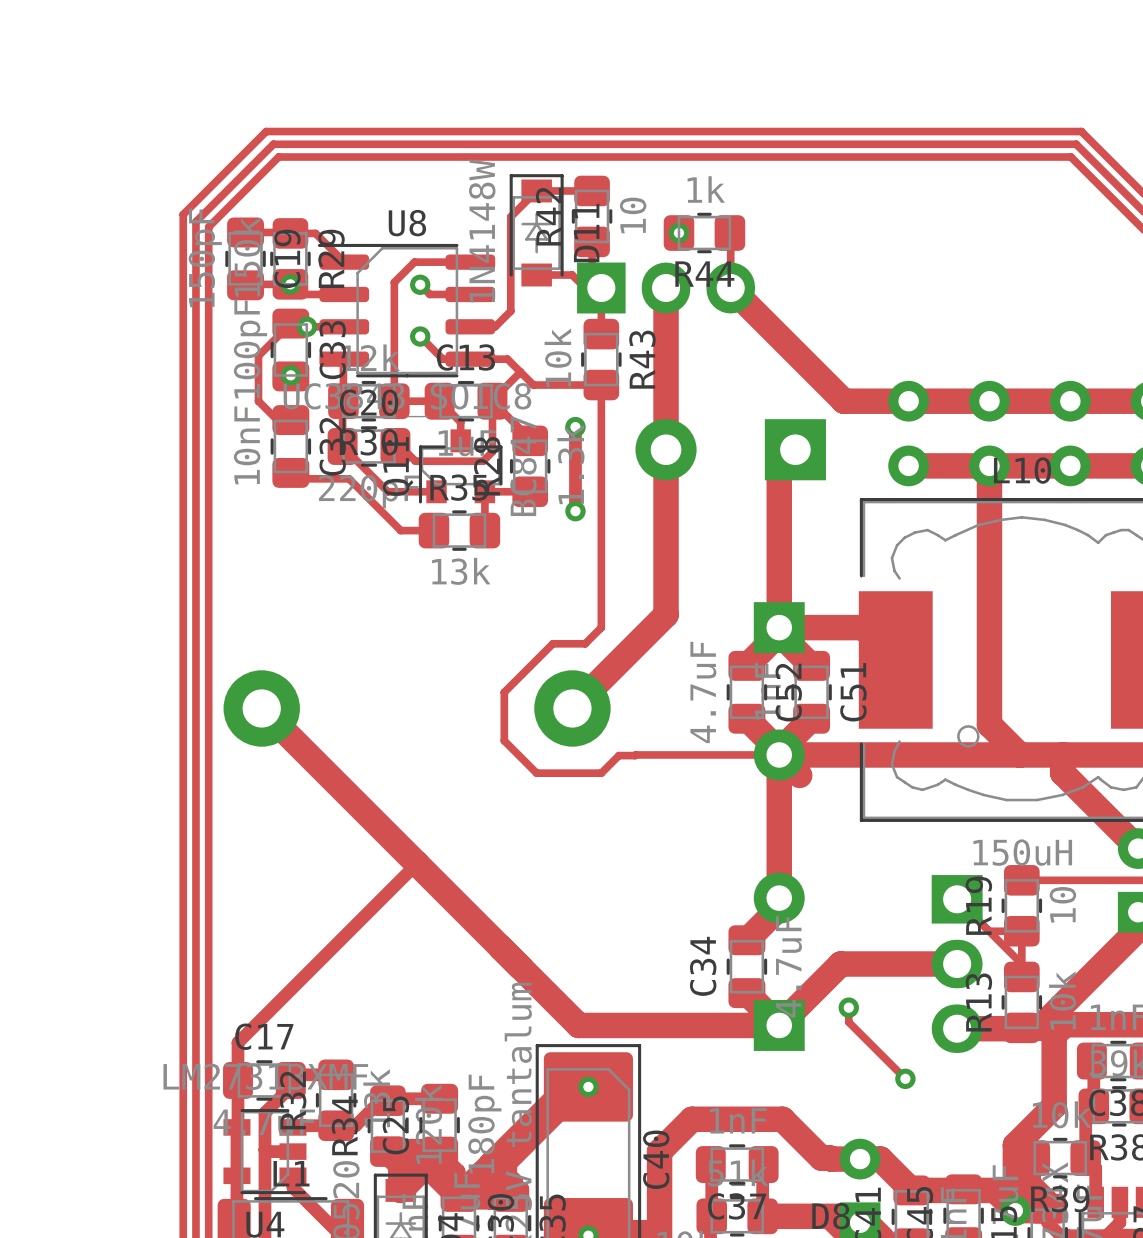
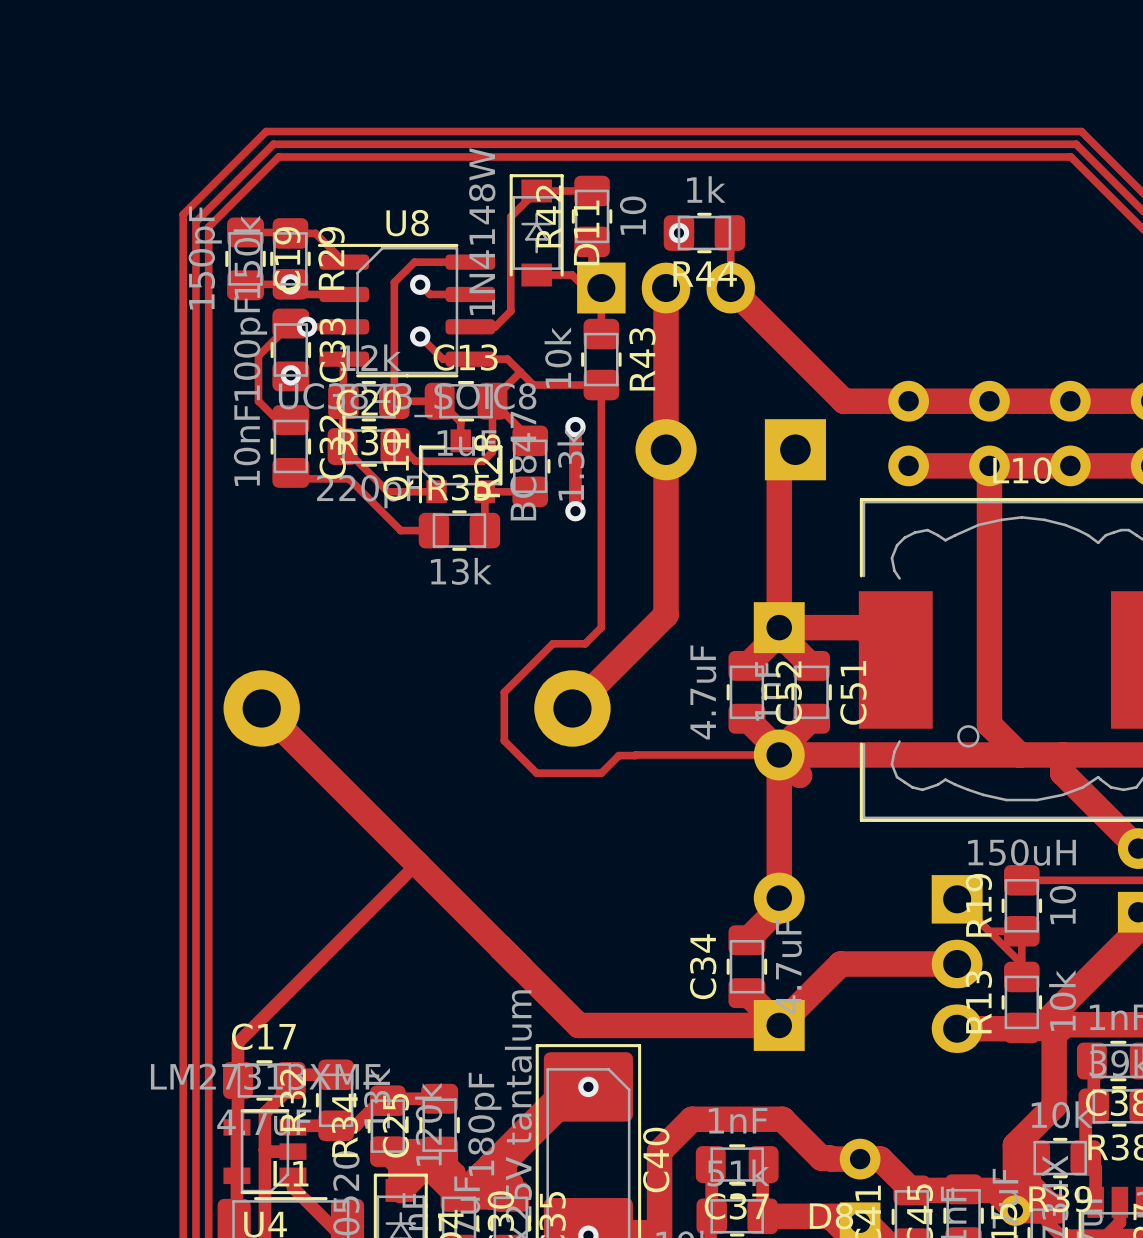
track: (848, 1007) (848, 1022) (905, 1078) -> none
via: (848, 1007) -> none
via: (905, 1078) -> none

